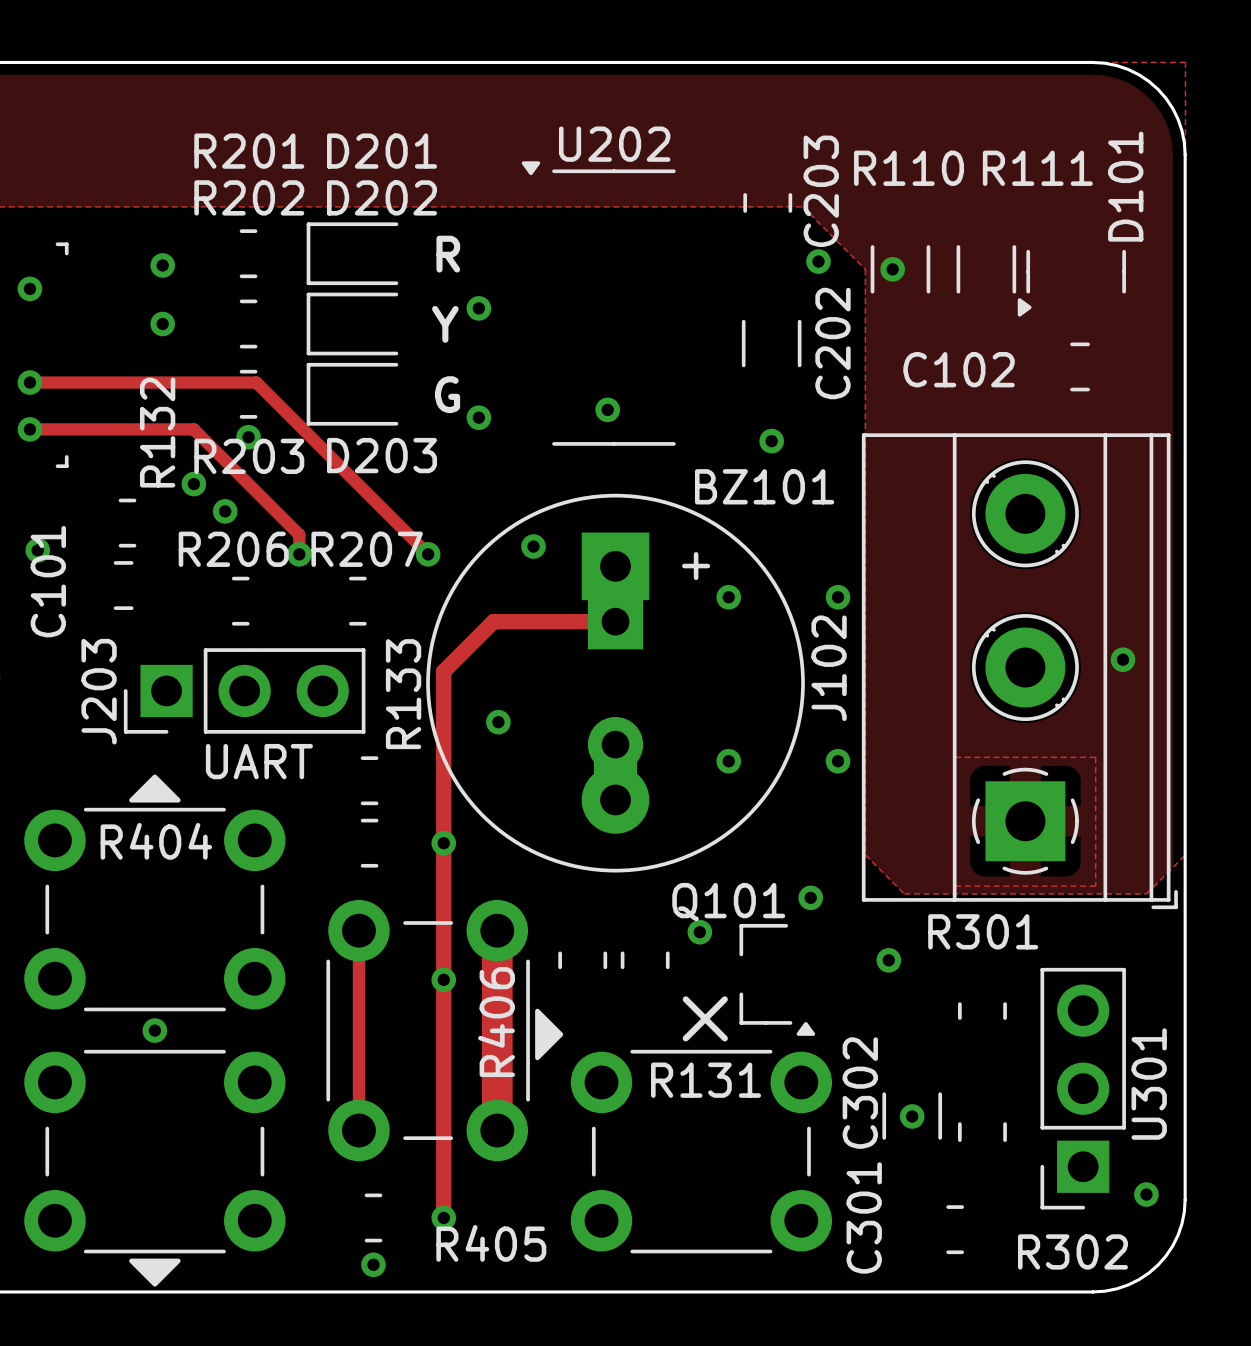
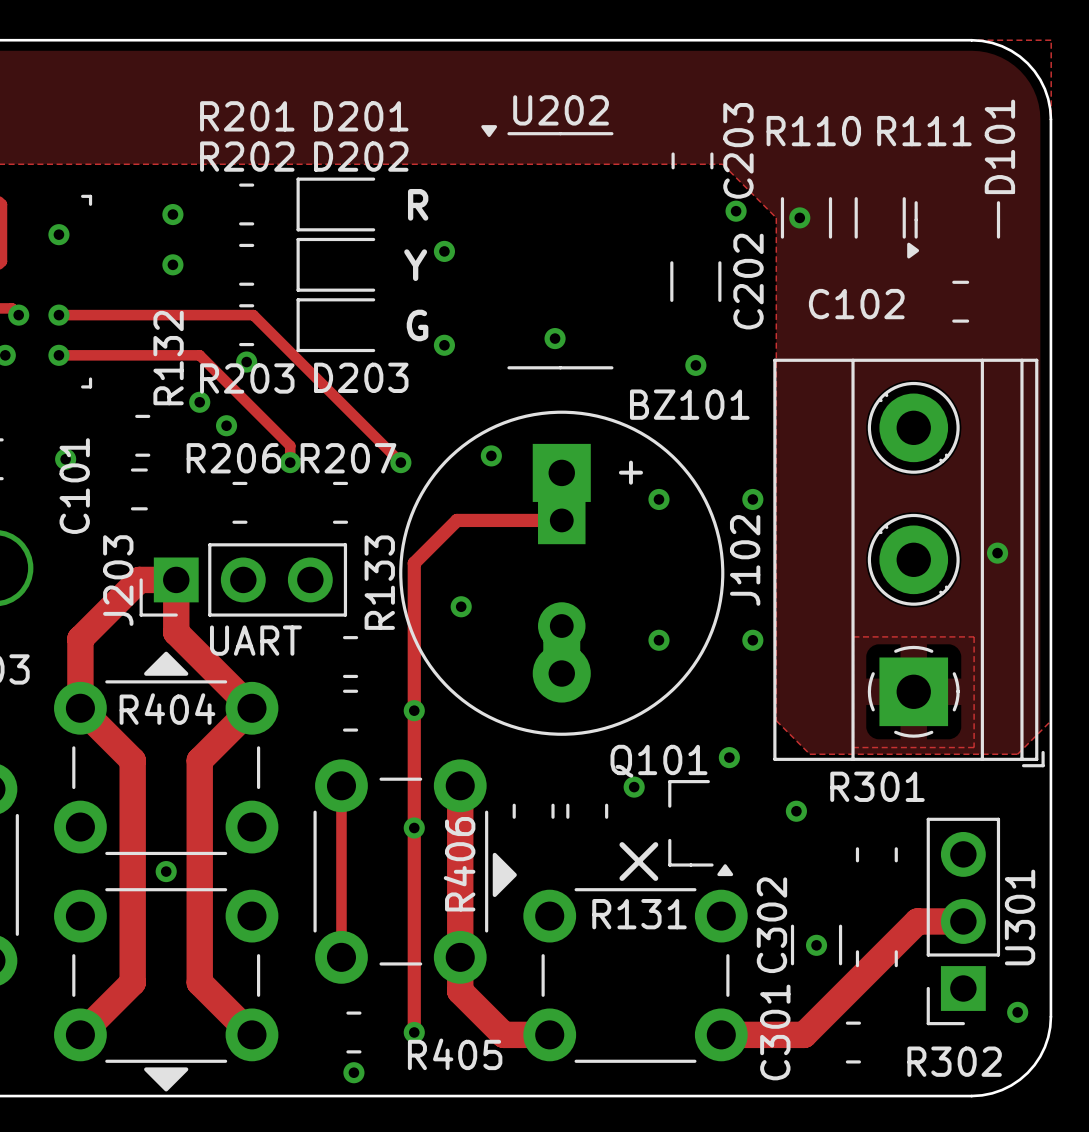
track: none -> (963, 921) (917, 921) (804, 1034) (721, 1034)
track: none -> (460, 957) (460, 991) (503, 1034) (549, 1034)
track: none -> (80, 1034) (132, 982) (132, 760) (80, 708) (80, 638) (139, 579) (176, 579) (176, 632) (251, 708) (199, 760) (199, 982) (251, 1034)

